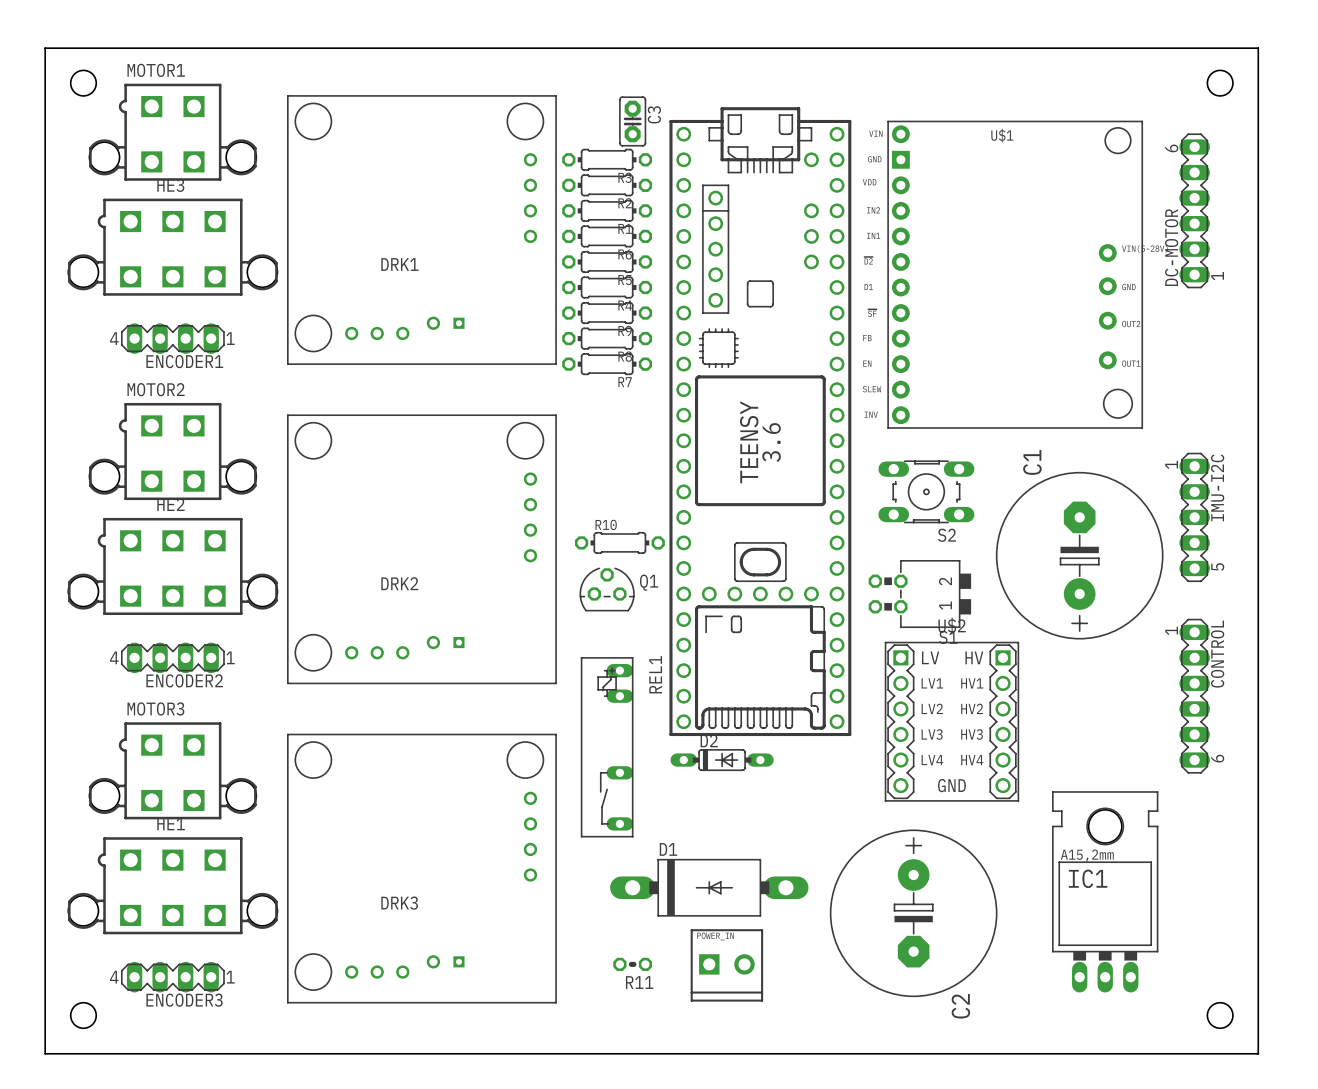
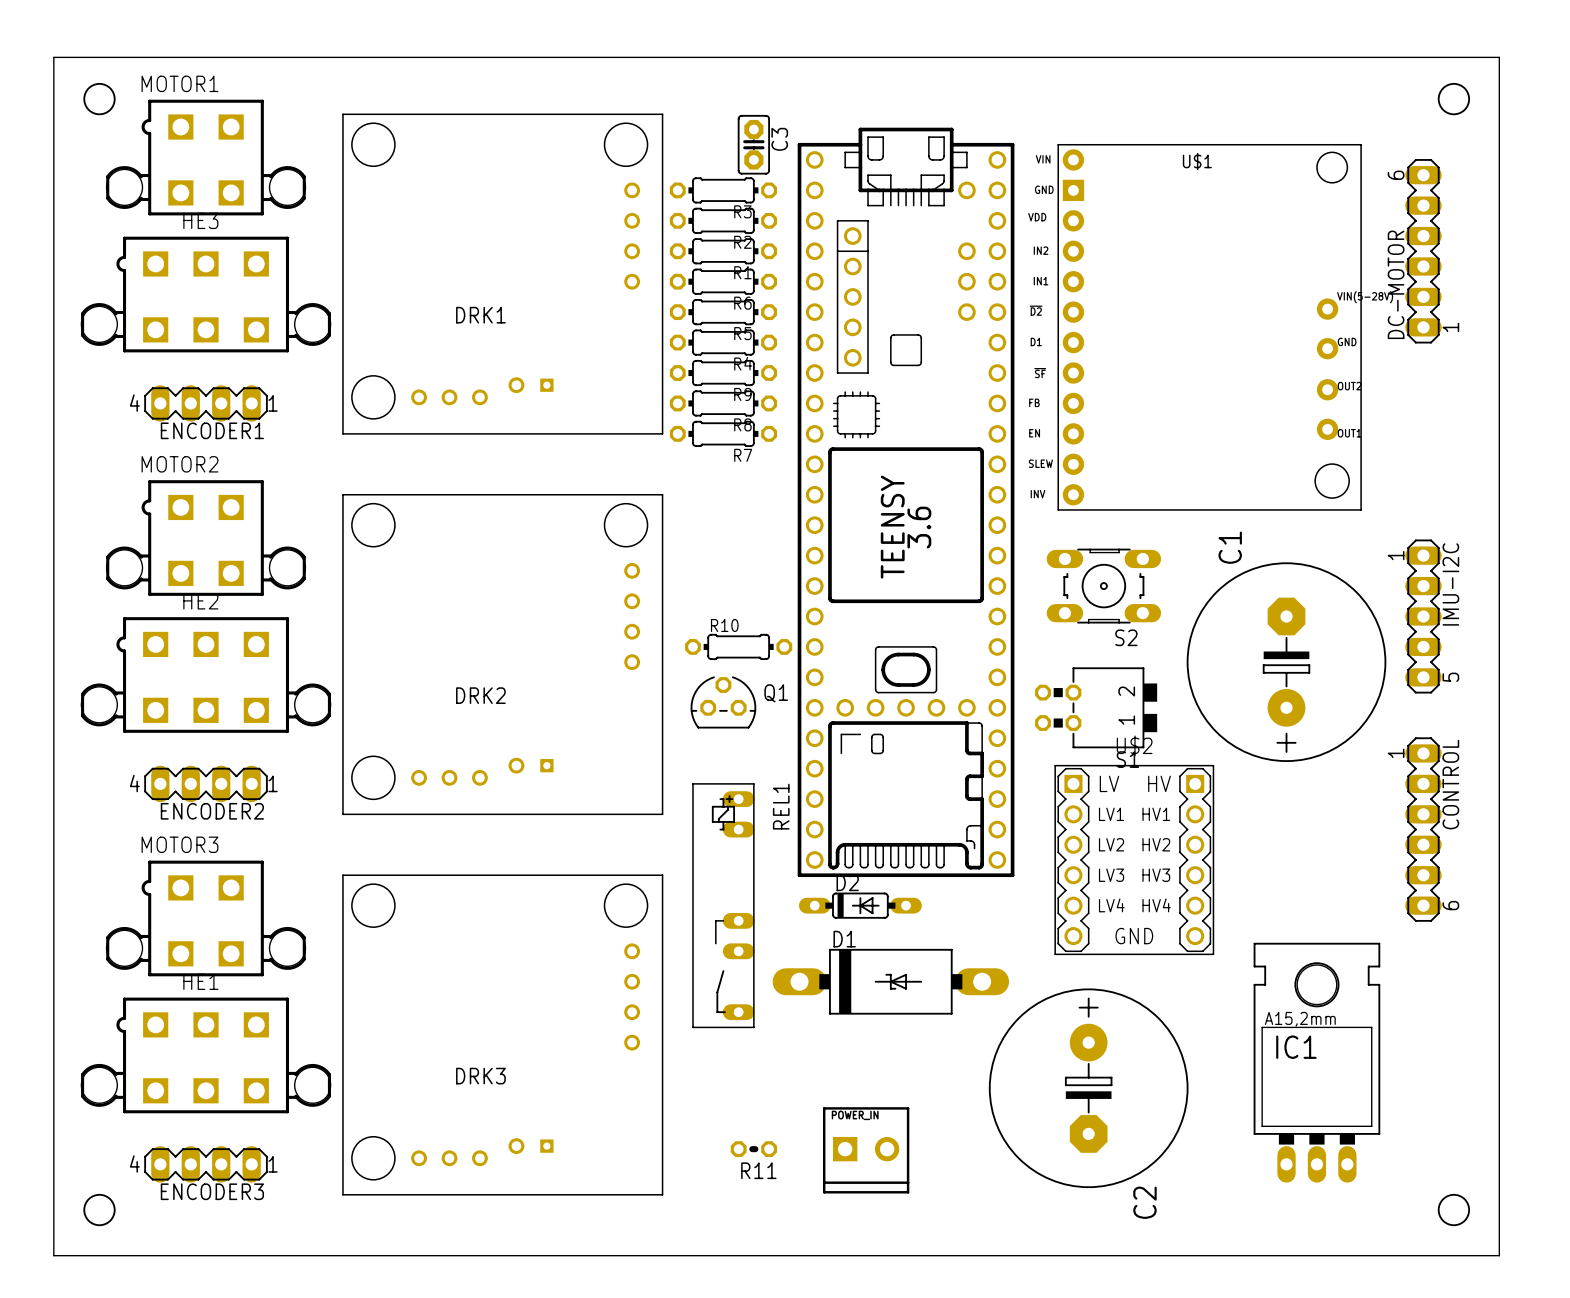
U$1 footprint: [887, 120, 1143, 429] -> [1057, 143, 1362, 511]
REL1 footprint: [580, 657, 634, 838] -> [692, 783, 755, 1029]
D1 footprint: [610, 858, 809, 917] -> [772, 948, 1010, 1015]

